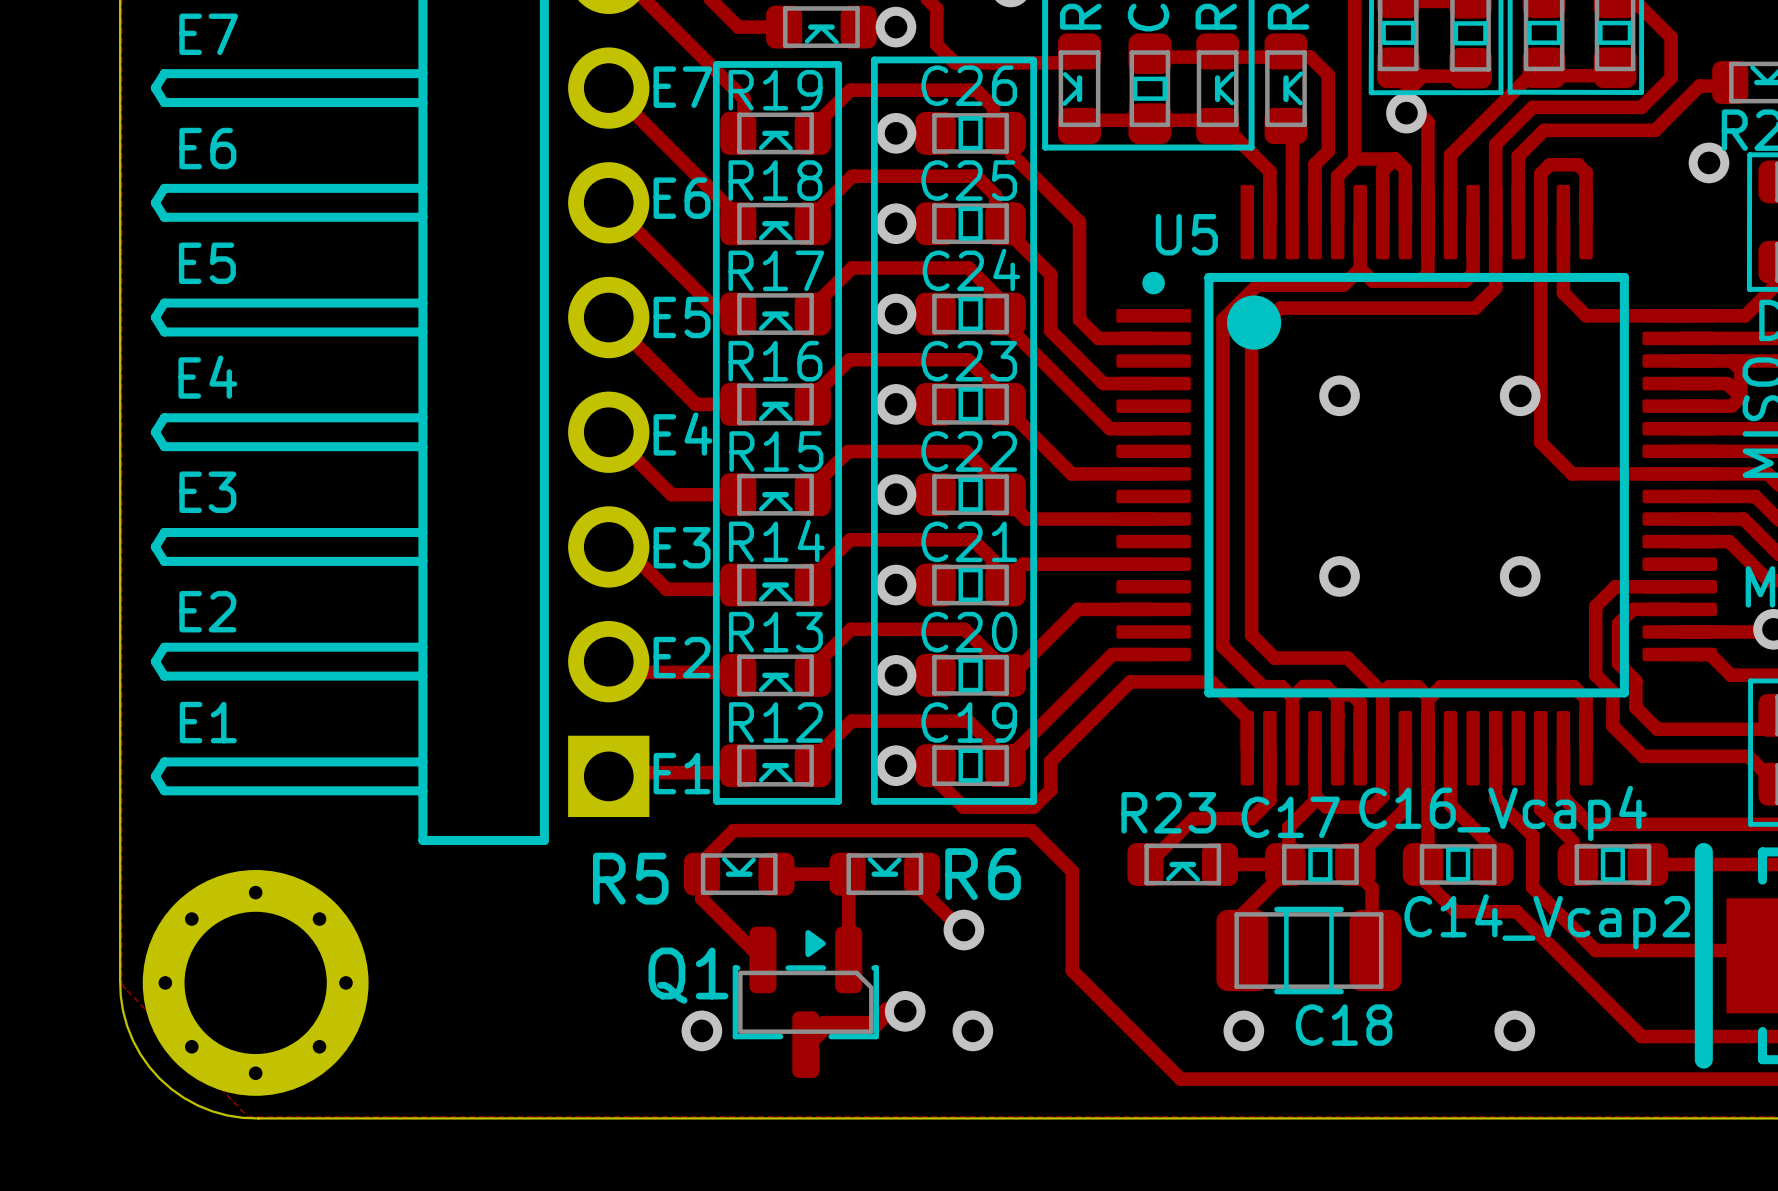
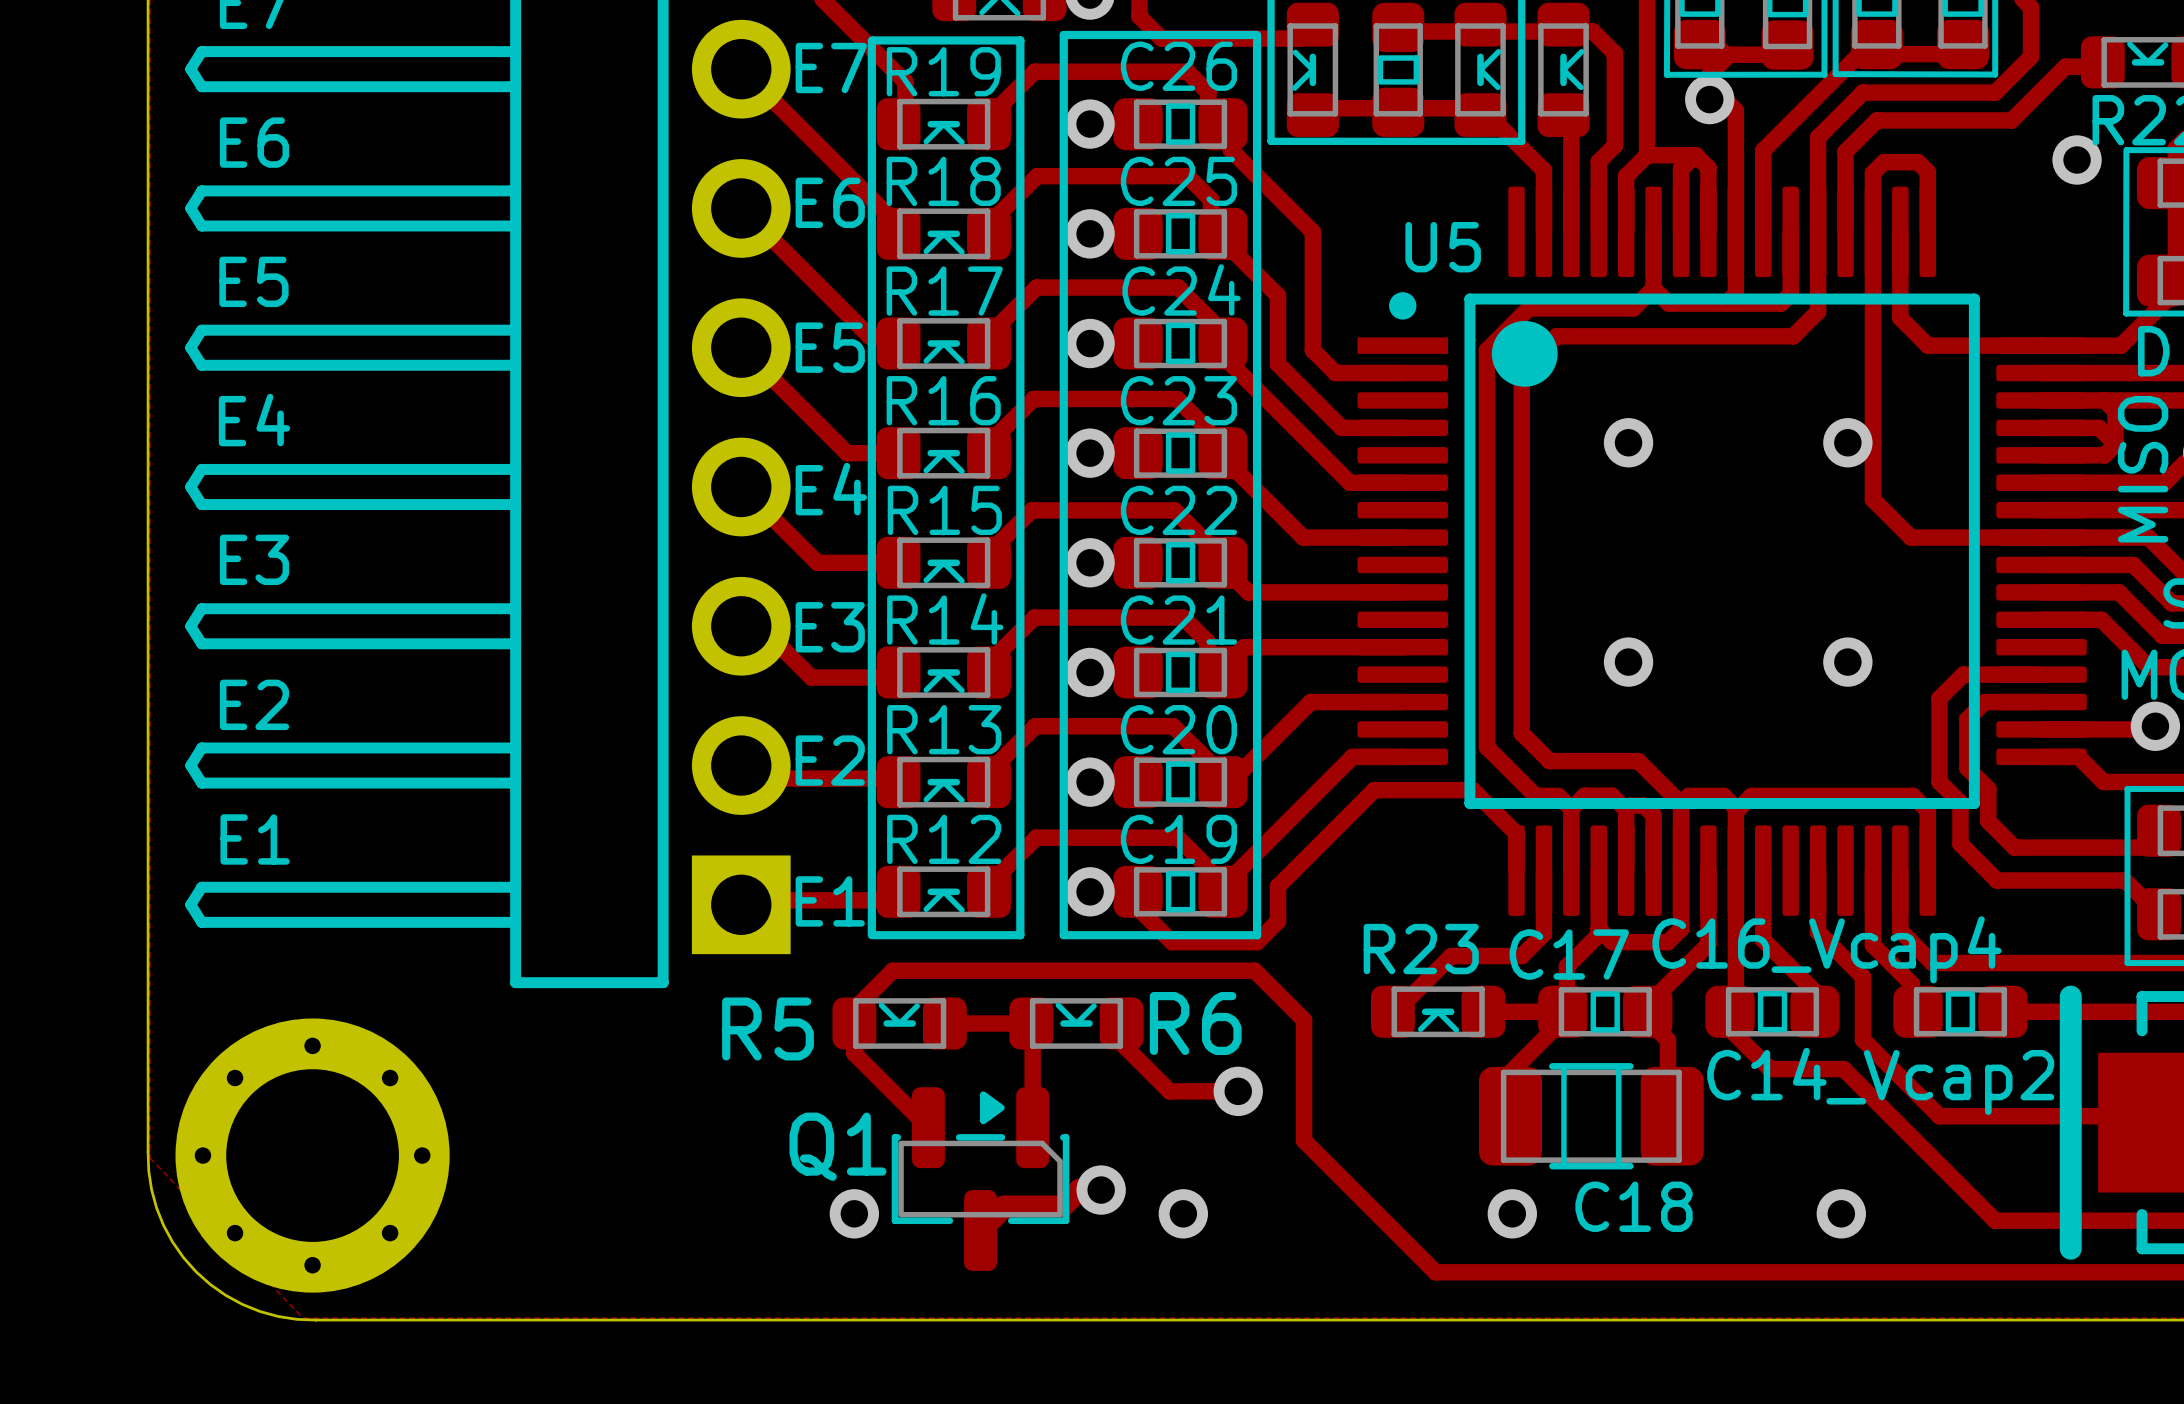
track: none -> (1172, 1091) (1238, 1091)
via position: (963, 930) -> (1238, 1091)

